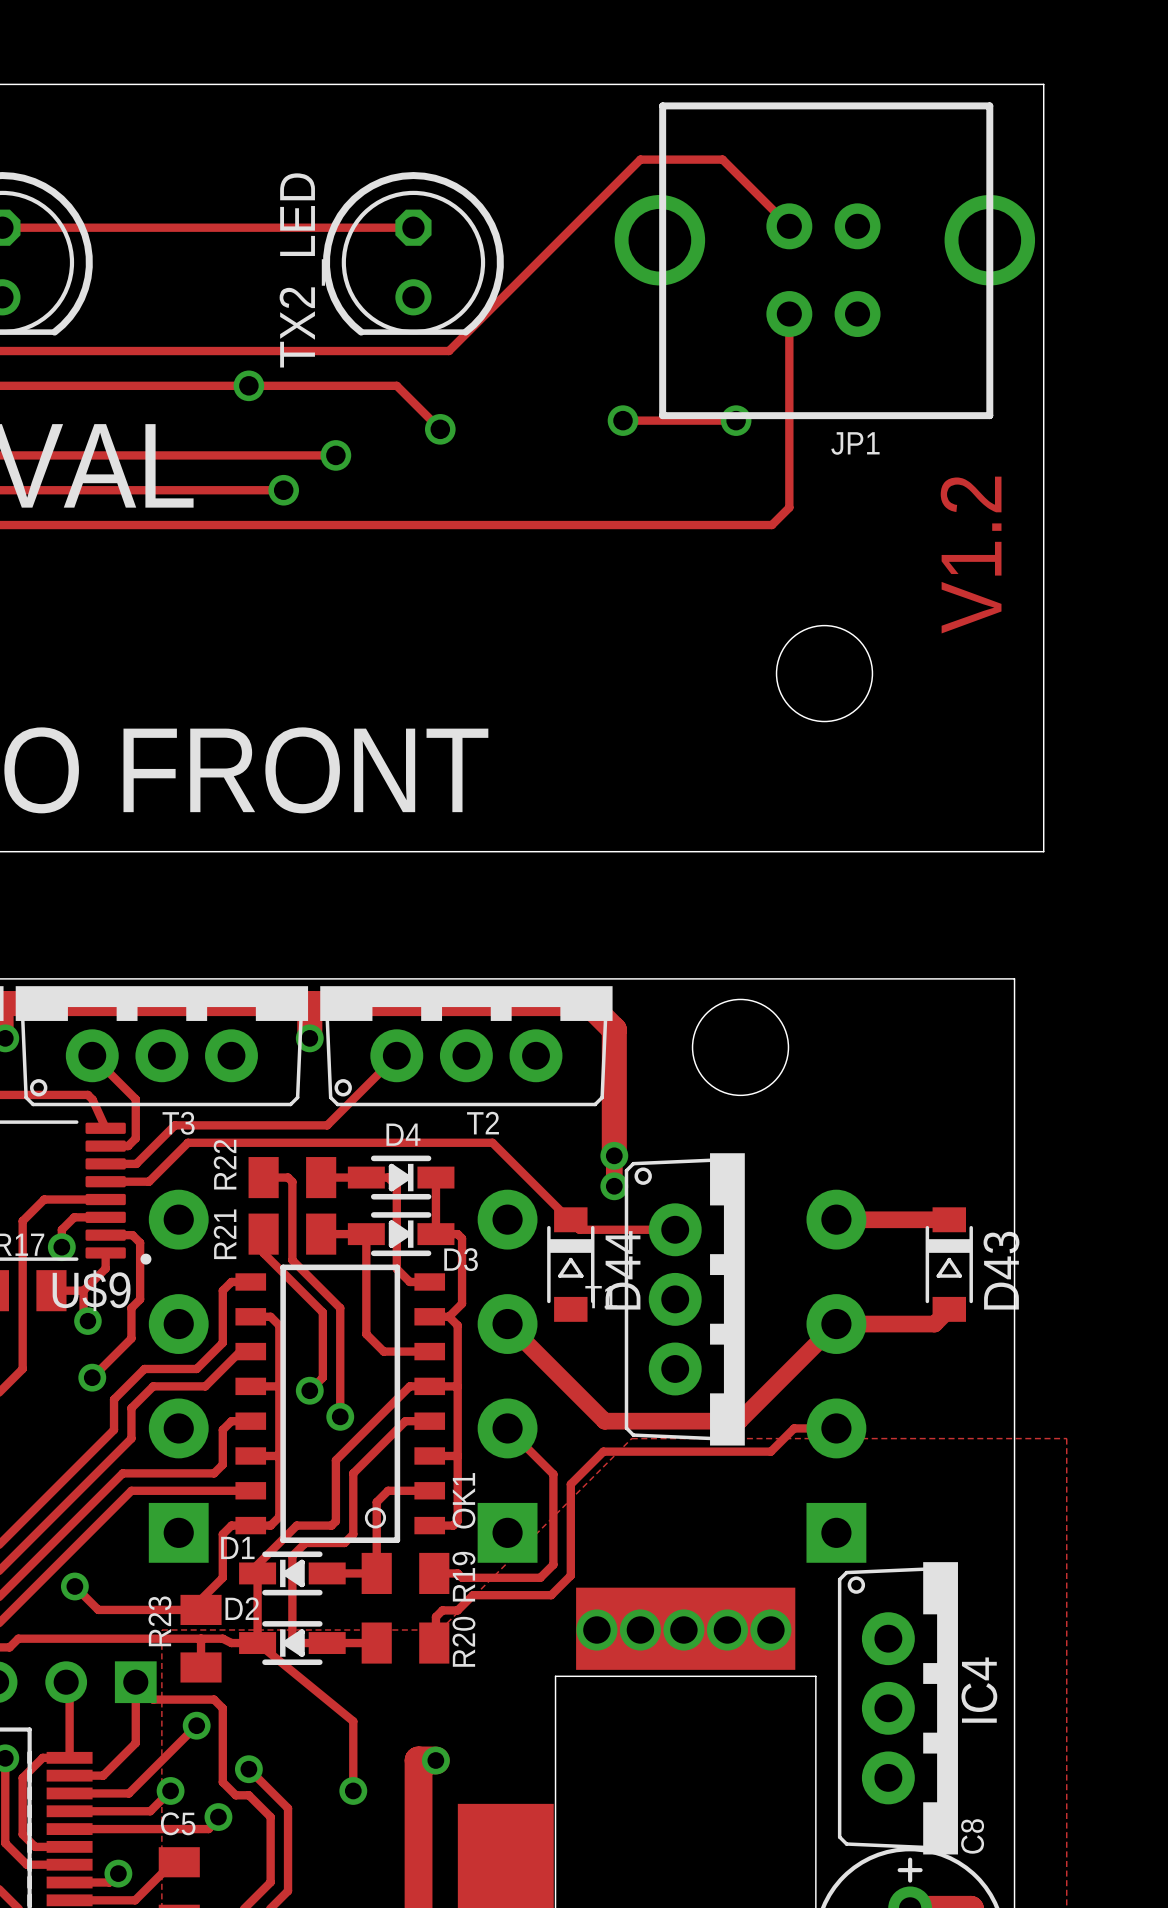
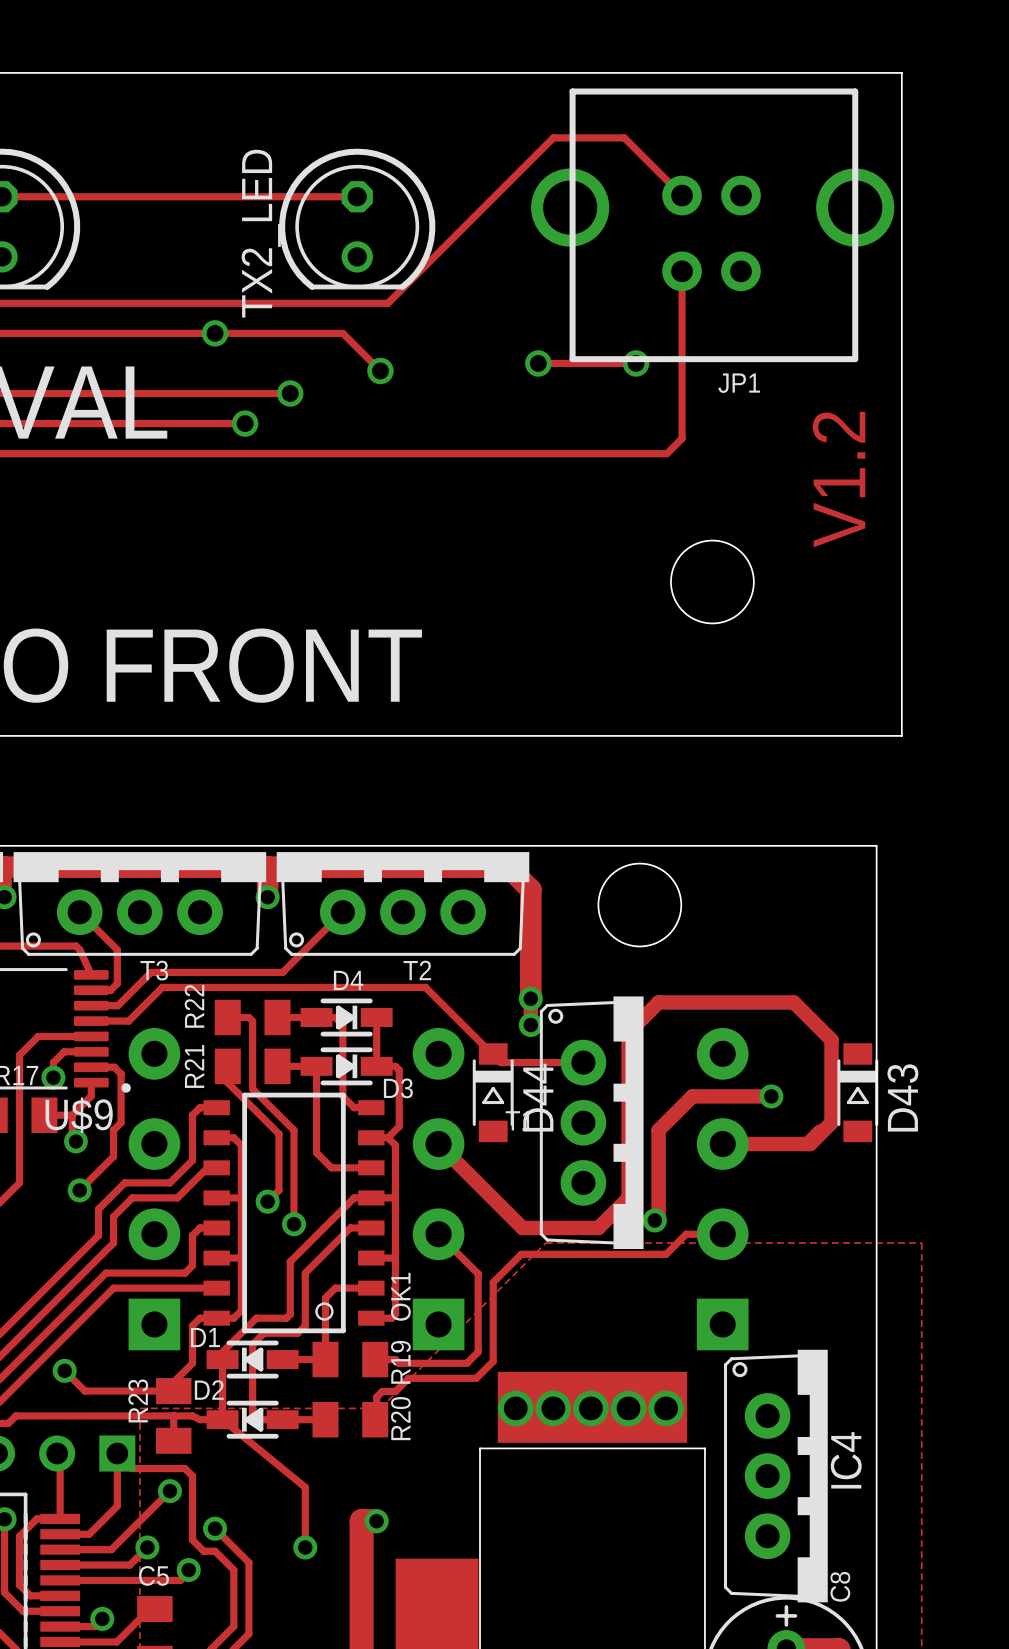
track: (836, 1219) (949, 1219) -> none
D43 position: (949, 1264) -> (857, 1092)
track: none -> (771, 1096) (692, 1096) (658, 1130) (658, 1216) (654, 1220)
via: none -> (771, 1096)
track: (836, 1324) (739, 1421) (692, 1421) -> (807, 1144) (810, 1144) (831, 1122) (831, 1040) (793, 1002) (658, 1002) (628, 1032) (628, 1197) (598, 1227)
via: none -> (654, 1220)

